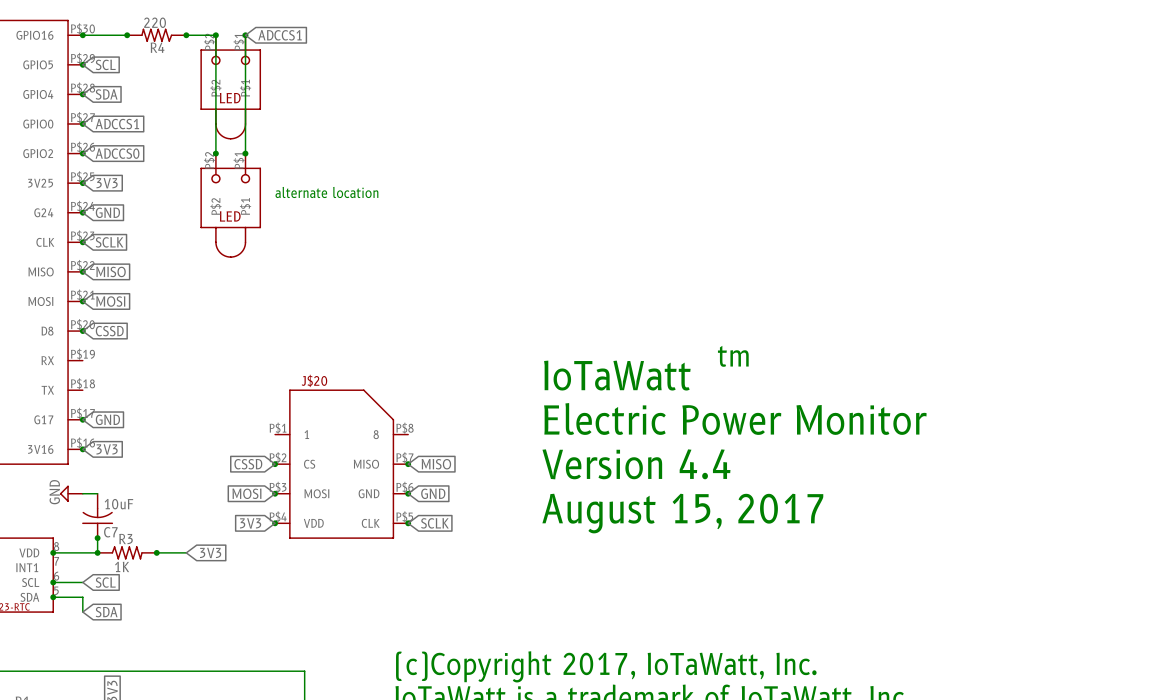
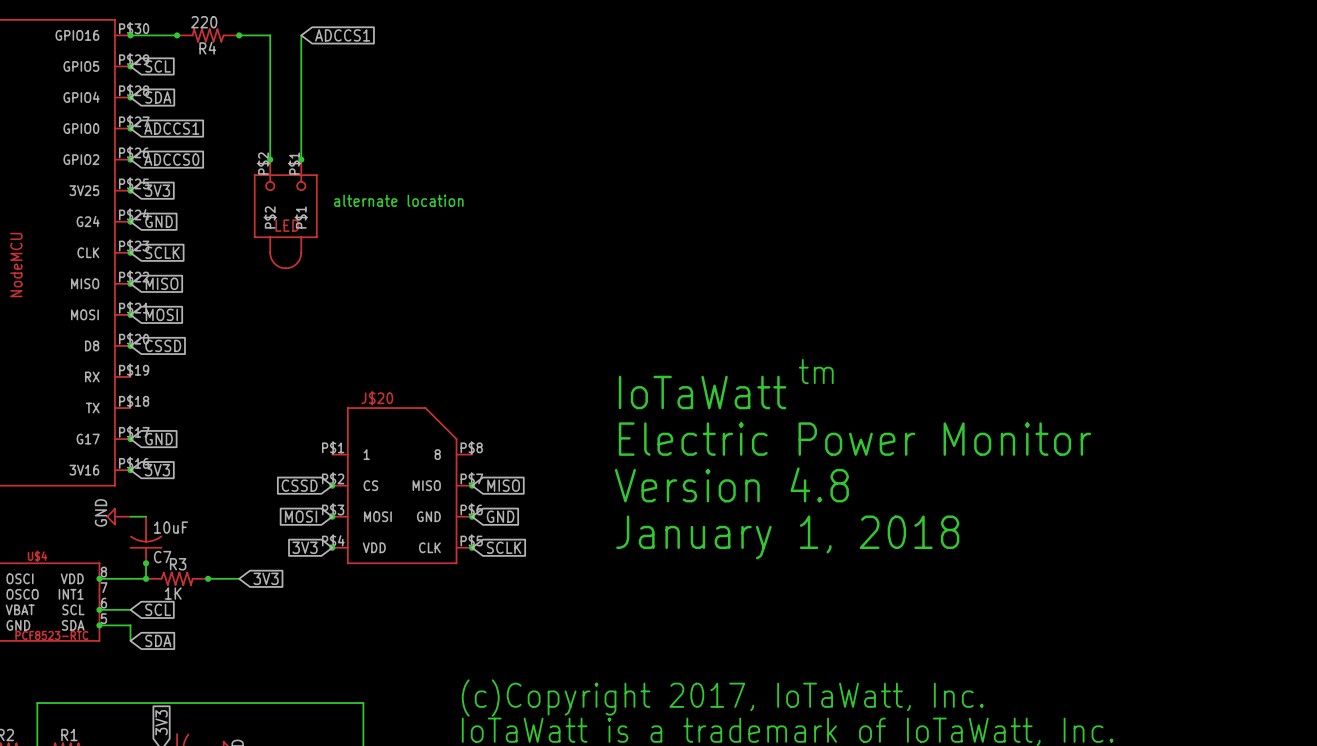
junction: (215, 35) -> none
junction: (245, 35) -> none
part: (230, 87) -> none
text: Version 4.4 (636, 464) -> Version 4.8 (731, 484)
text: August 15, 2017 (682, 513) -> January 1, 2018 (787, 537)

